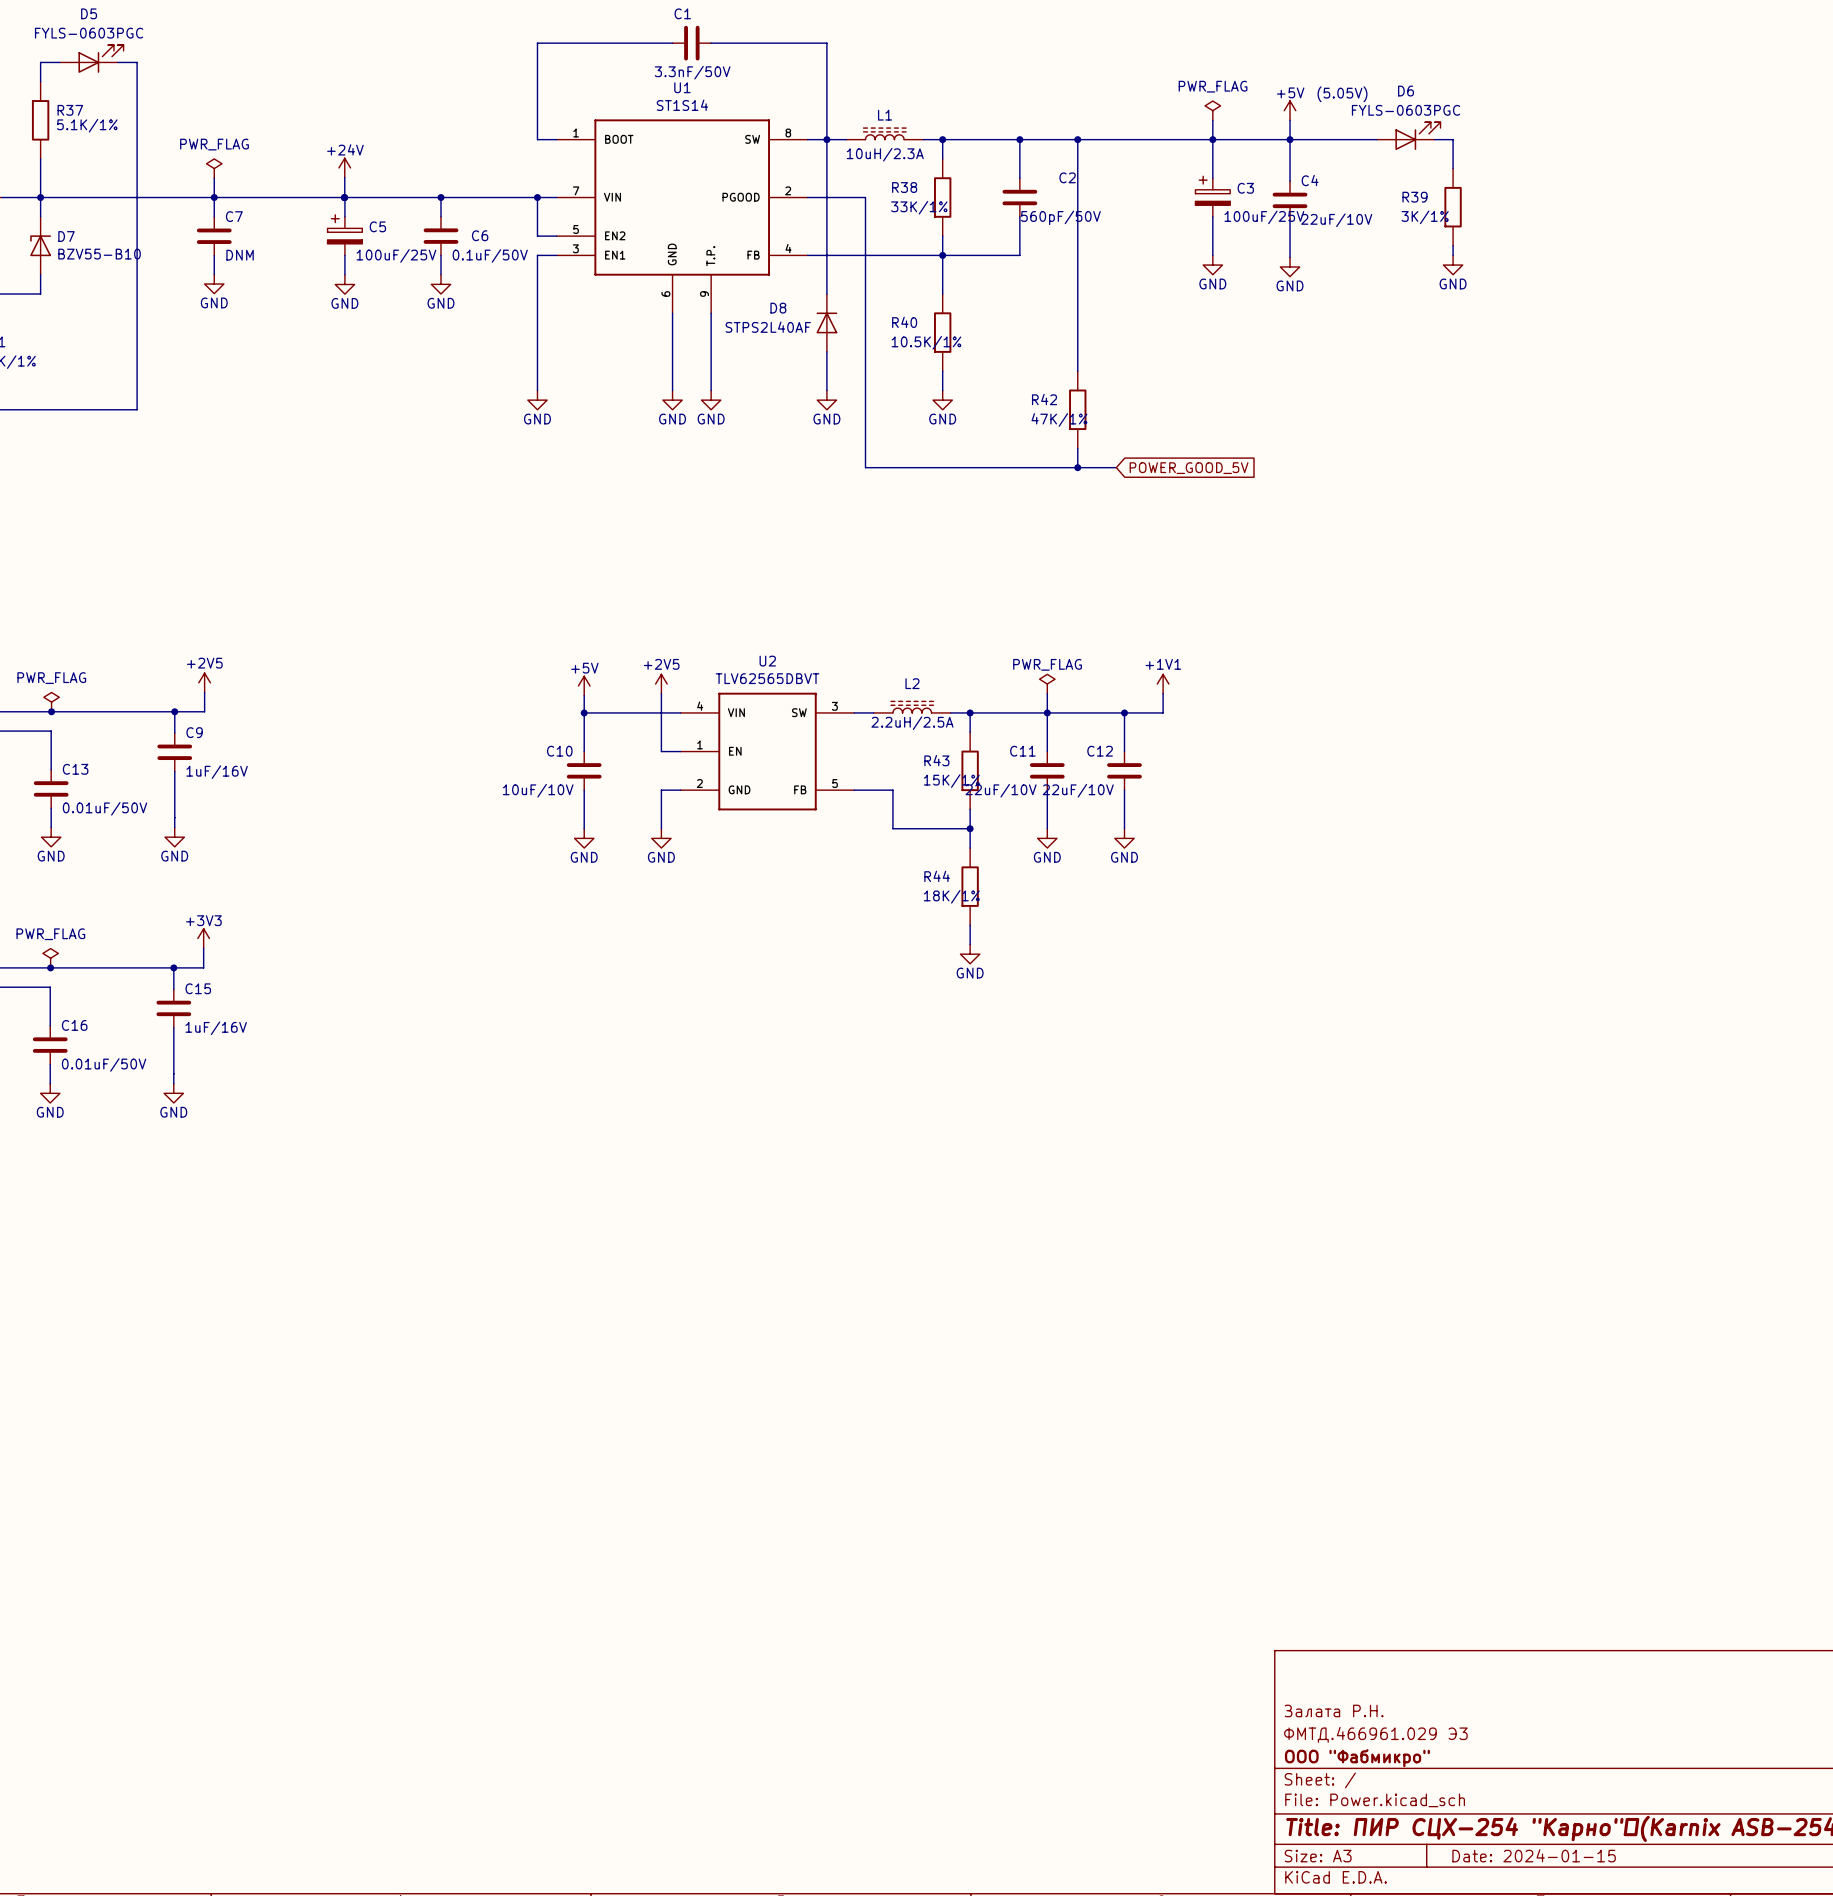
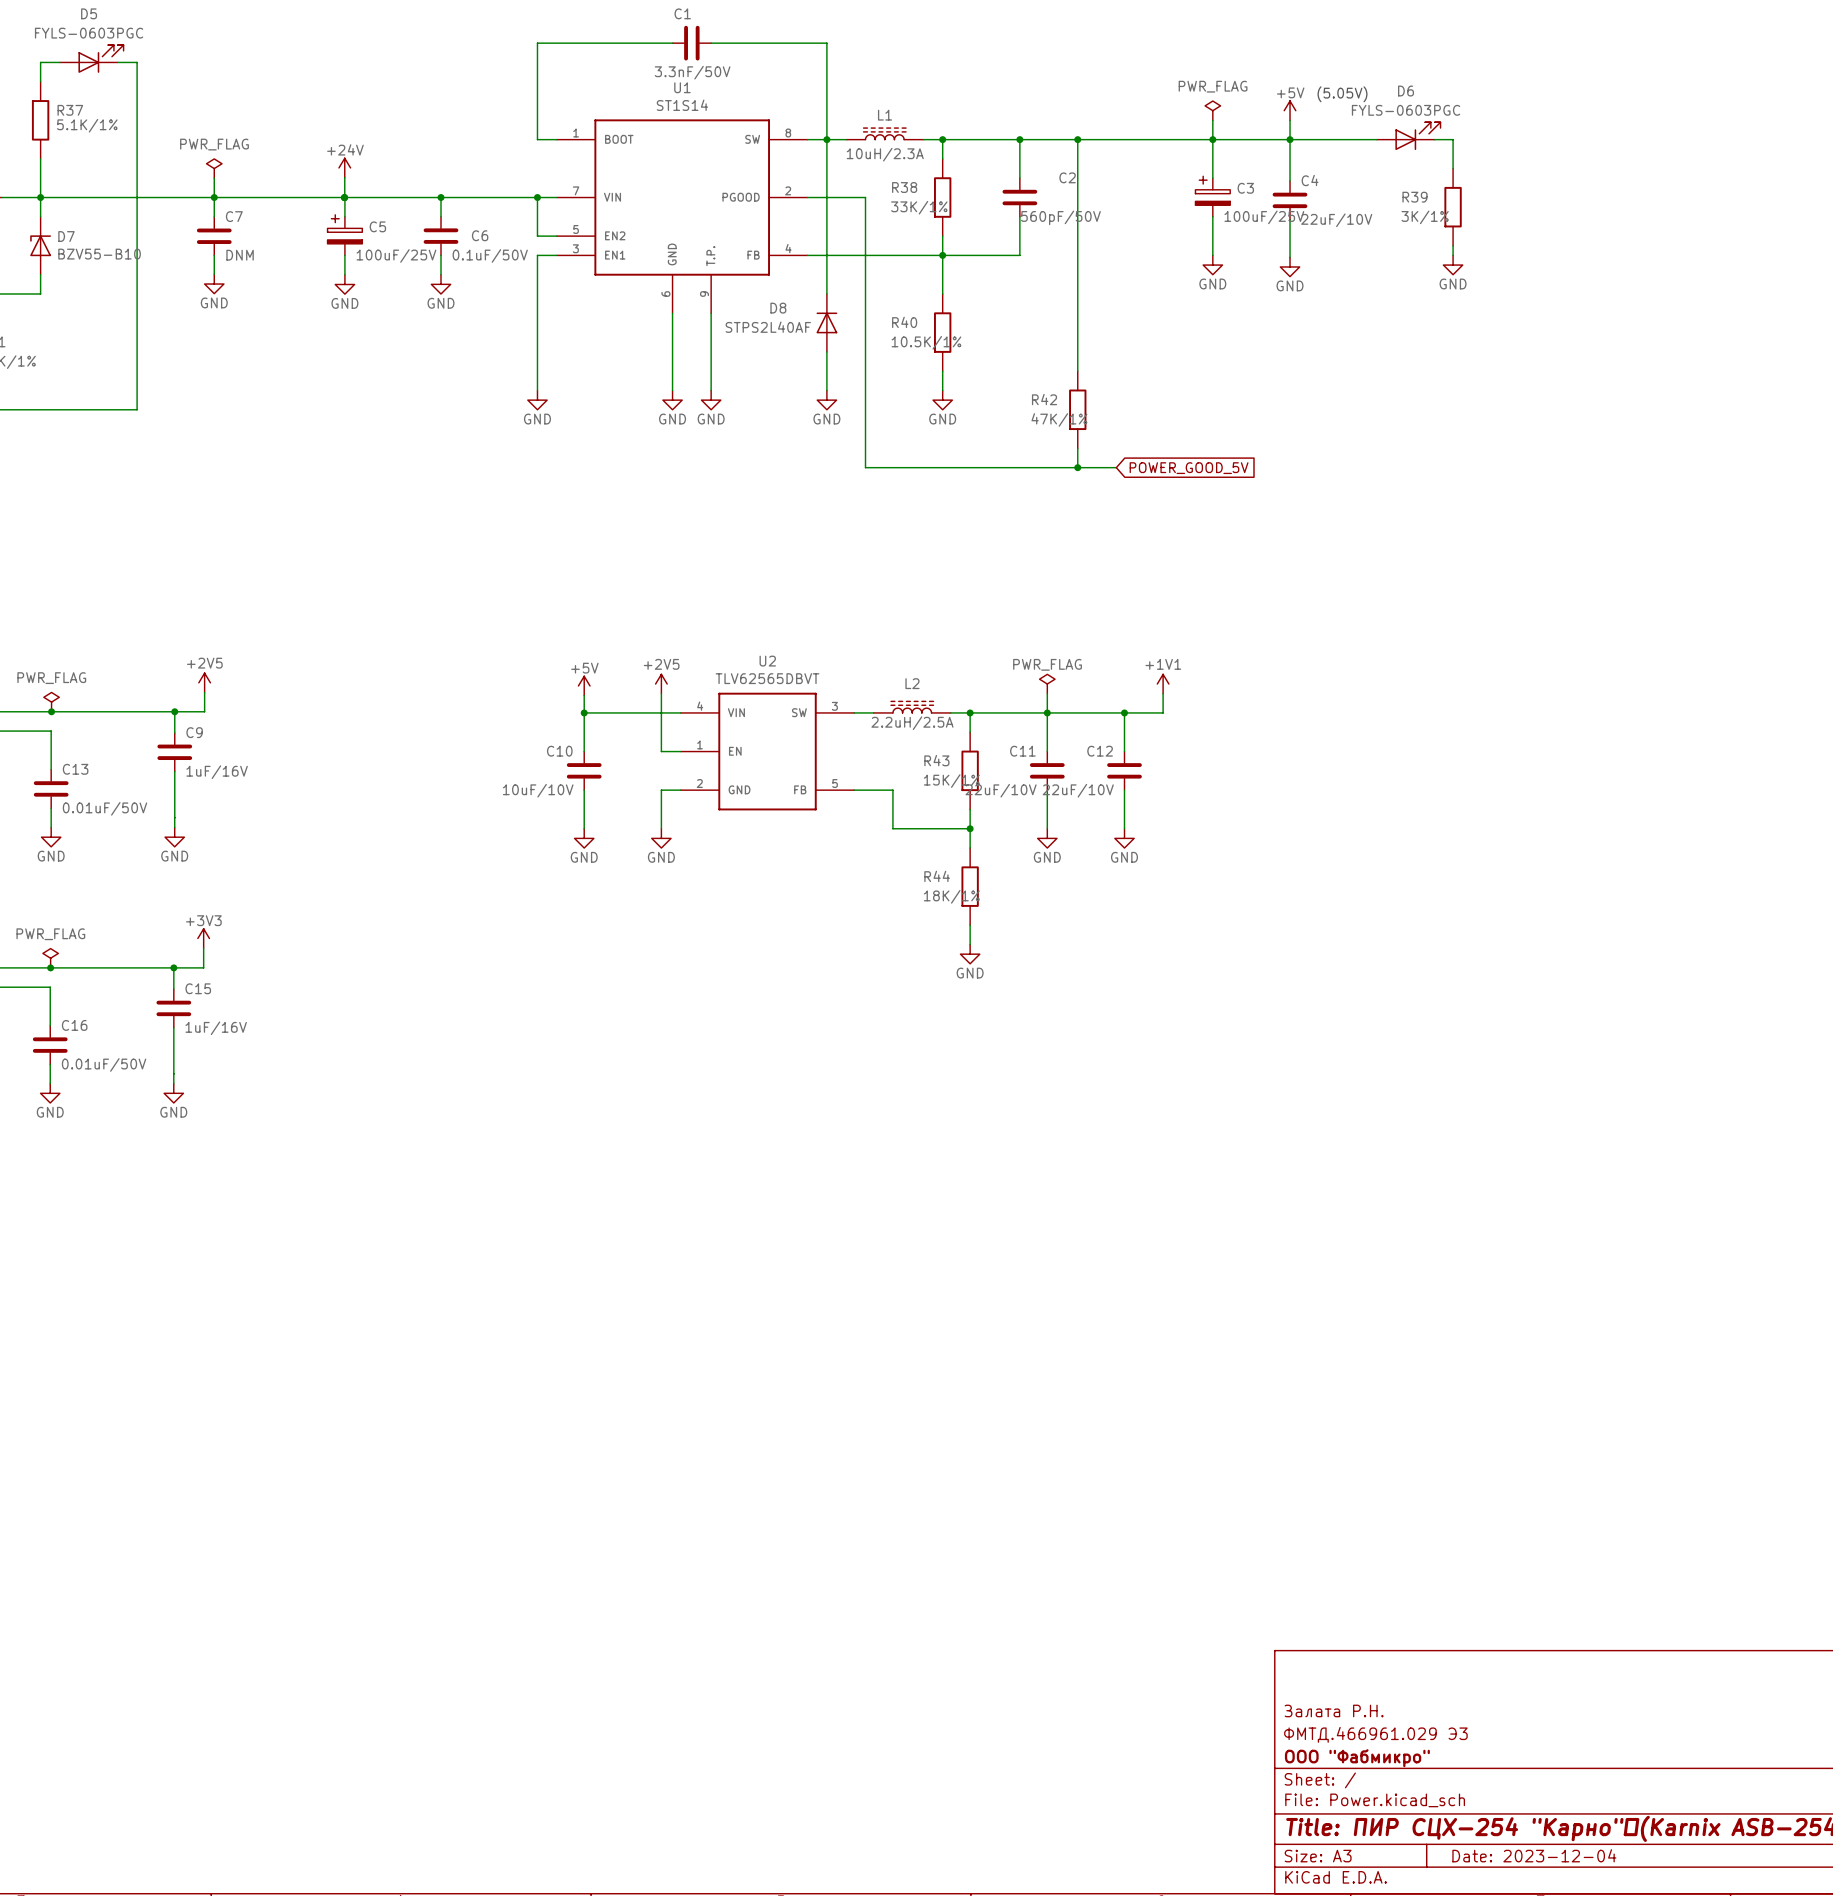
title block: Date: 2024-01-15 (1534, 1855) -> Date: 2023-12-04 (1534, 1855)

